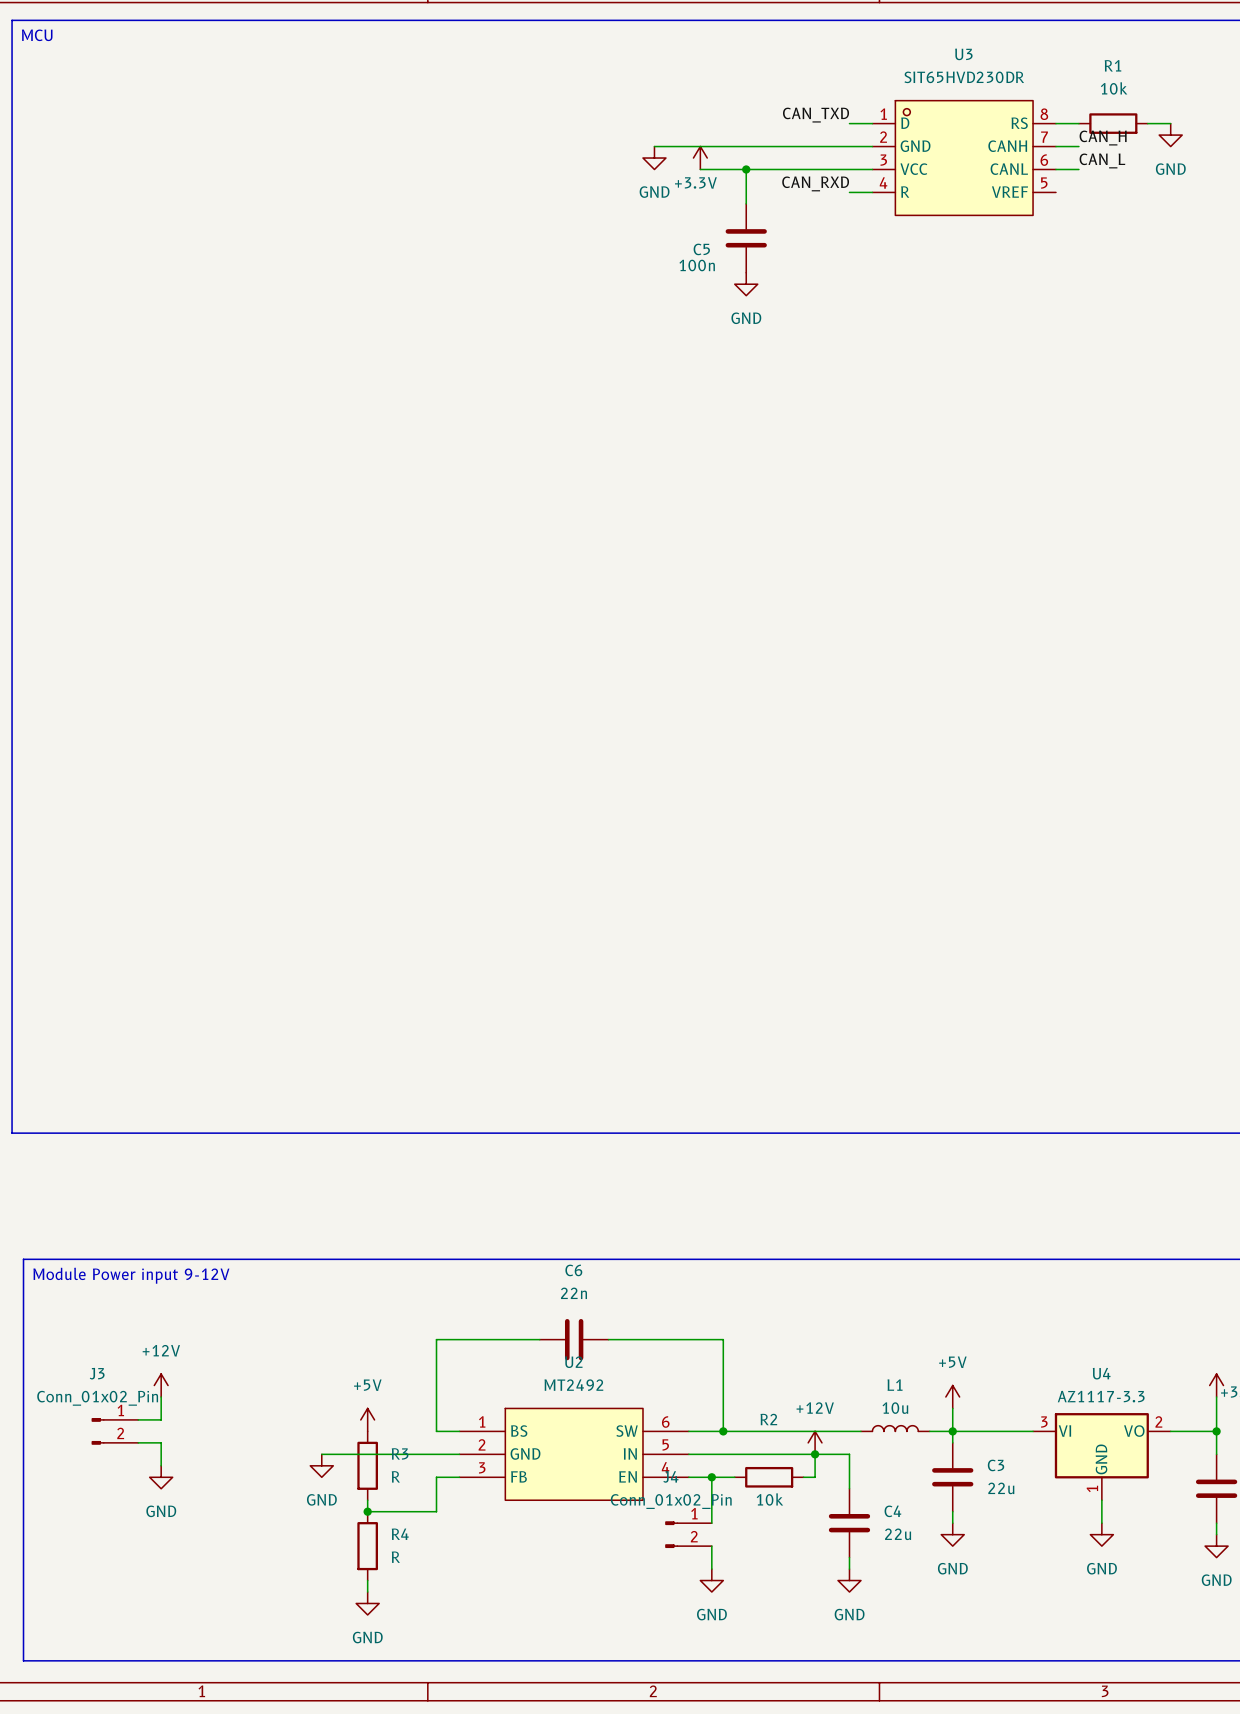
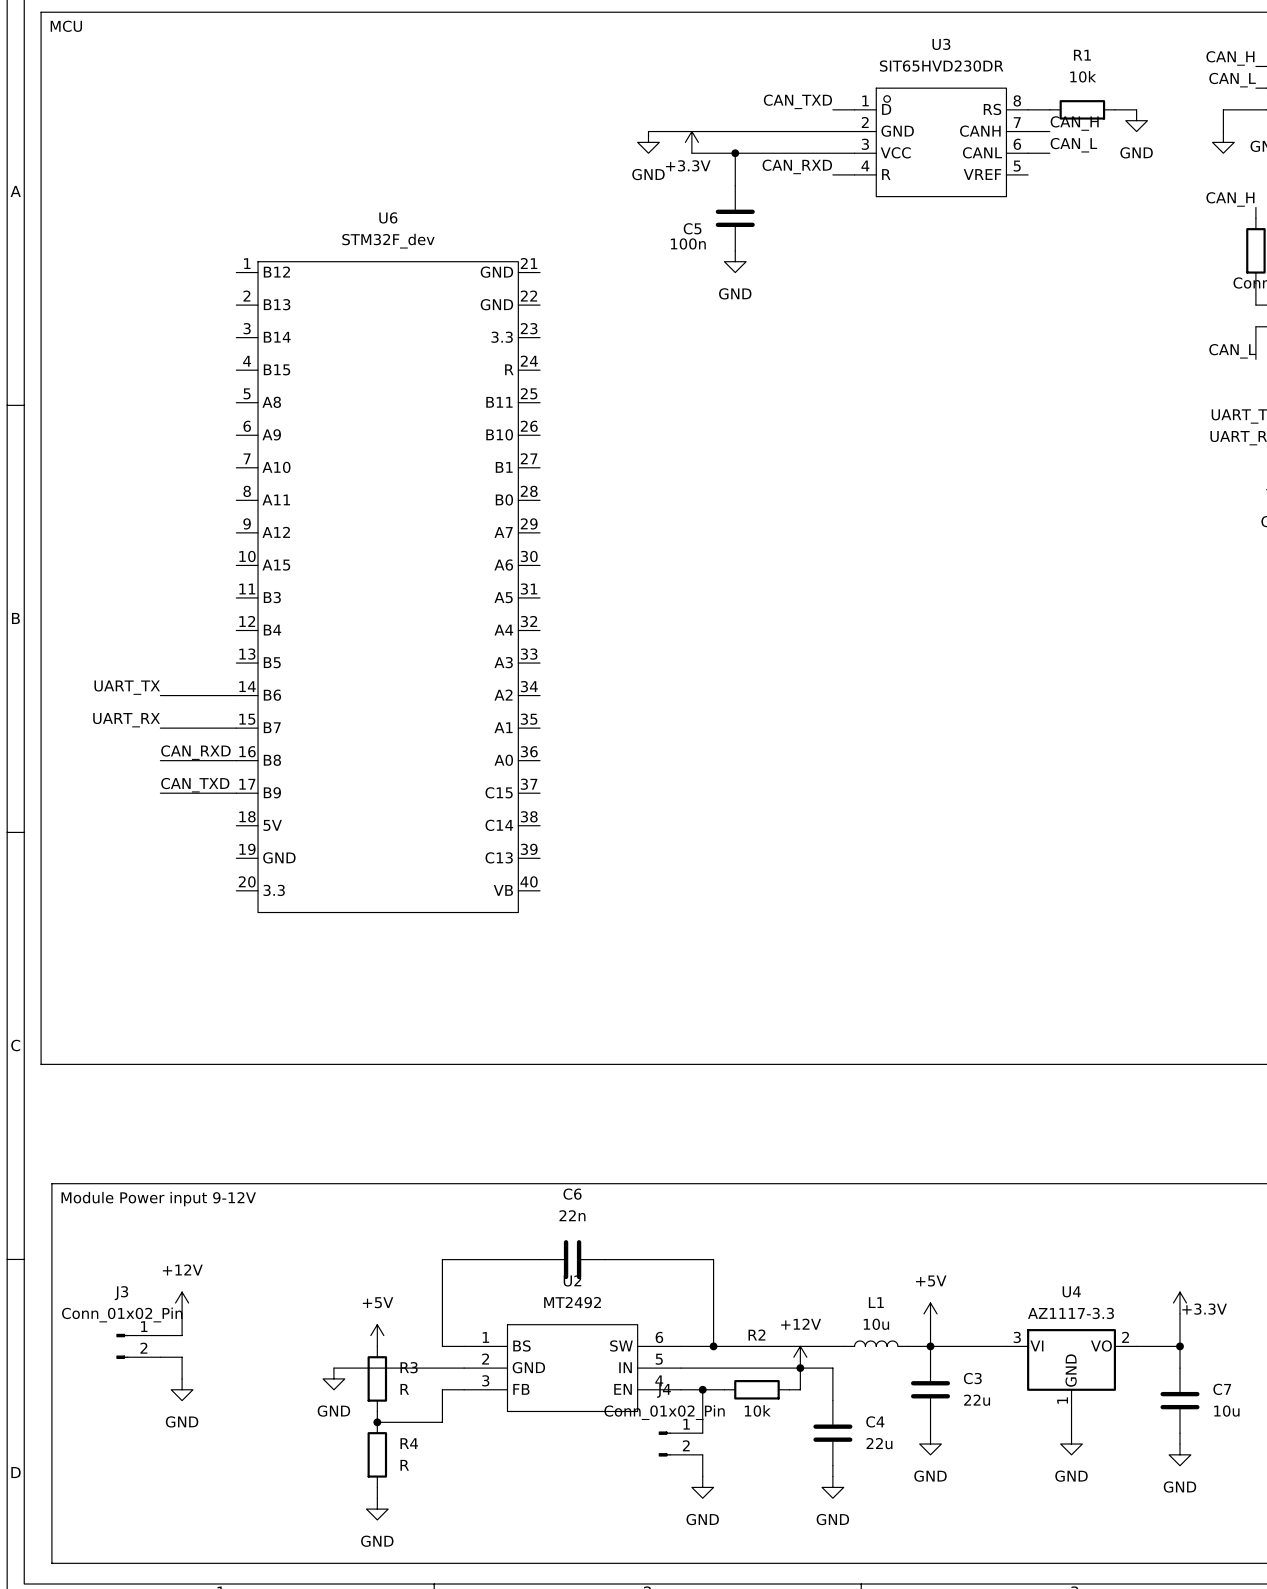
U6: none -> STM32F_dev (388, 587)
label: none -> UART_TX (127, 687)
wire: none -> (160, 695) (236, 695)
label: none -> UART_RX (126, 720)
wire: none -> (160, 728) (236, 728)
label: none -> CAN_RXD (195, 752)
wire: none -> (160, 760) (236, 760)
label: none -> CAN_TXD (195, 785)
wire: none -> (160, 793) (236, 793)

